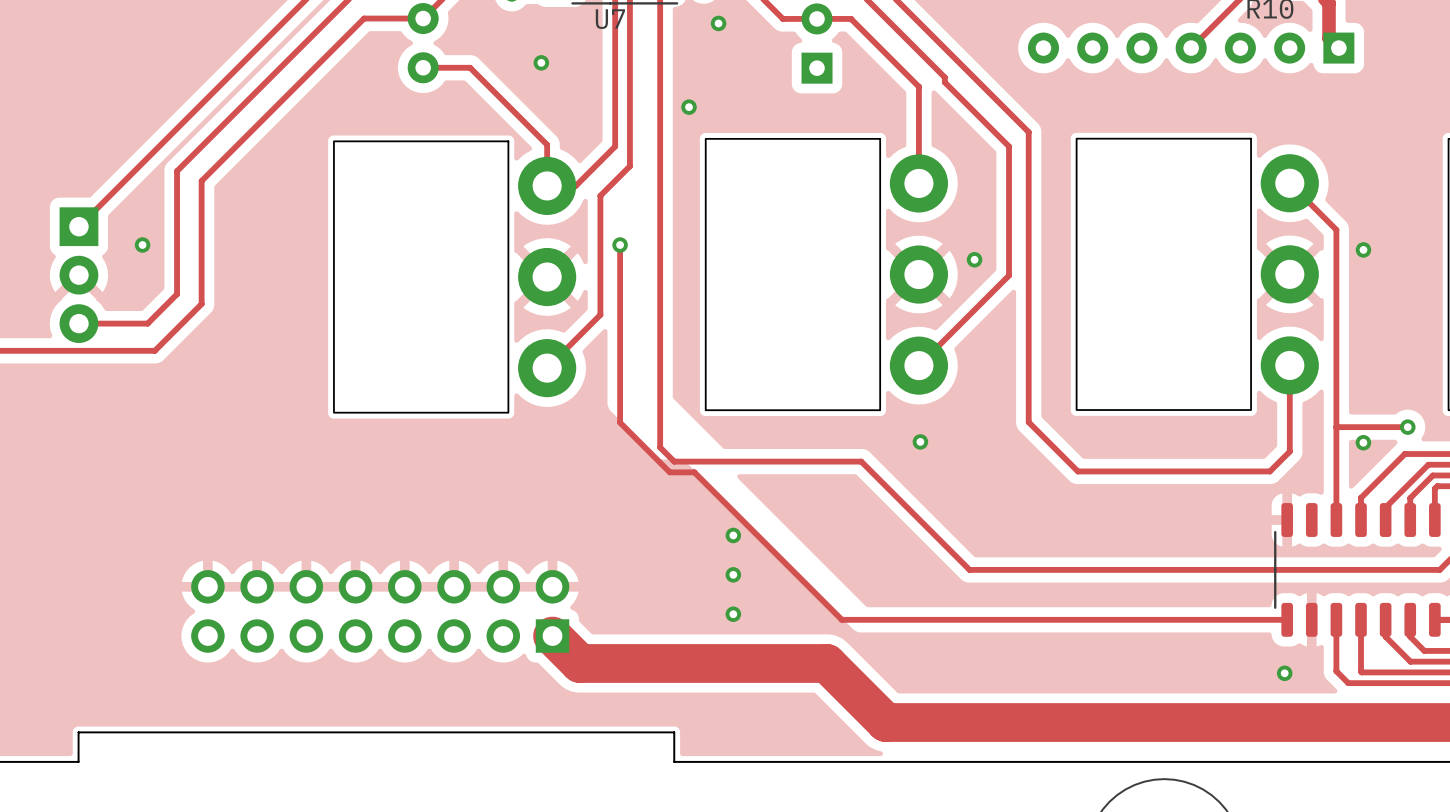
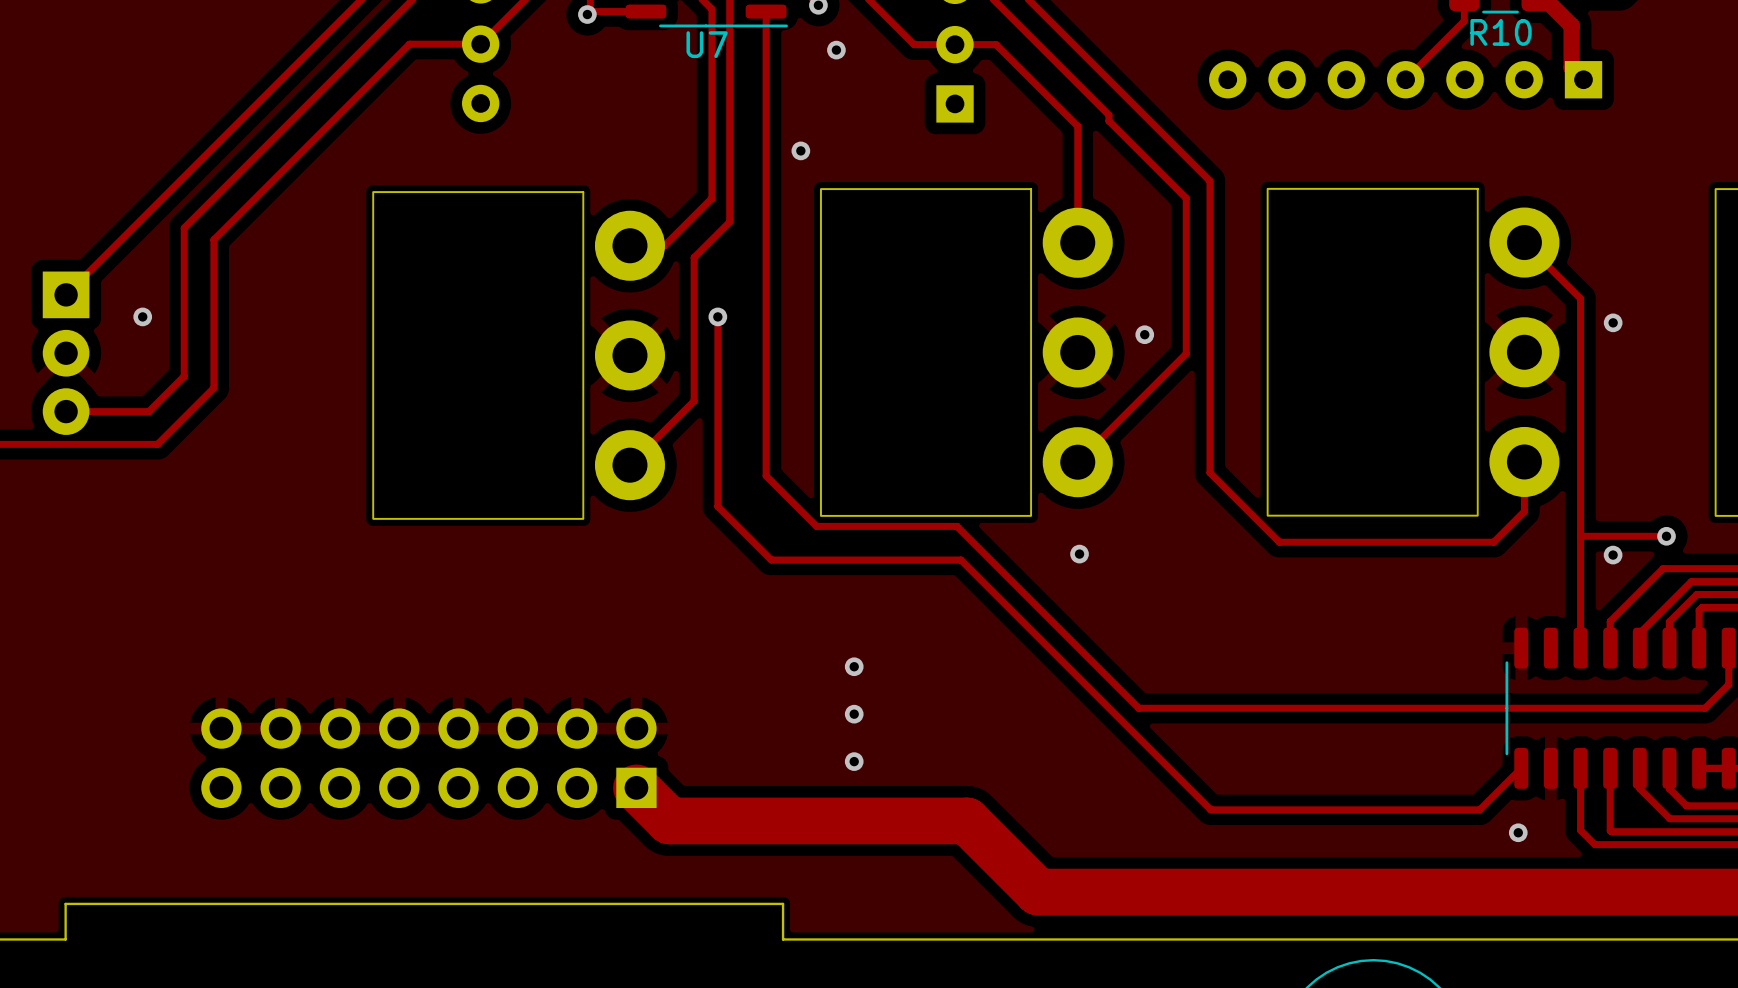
via: (541, 62) -> none
track: (423, 67) (470, 67) (547, 144) (547, 185) -> none
track: (1028, 374) (1028, 422) (1077, 471) (1269, 471) (1289, 451) (1289, 406) -> (1209, 472) (1279, 542) (1493, 542) (1524, 511)
track: (660, 376) (660, 447) (674, 461) (861, 461) -> (766, 475) (816, 526) (956, 526) (1008, 577)
track: (620, 402) (620, 422) (669, 472) (694, 472) (841, 619) (1287, 619) -> (717, 506) (771, 560) (960, 560) (1210, 809) (1479, 809) (1521, 768)

